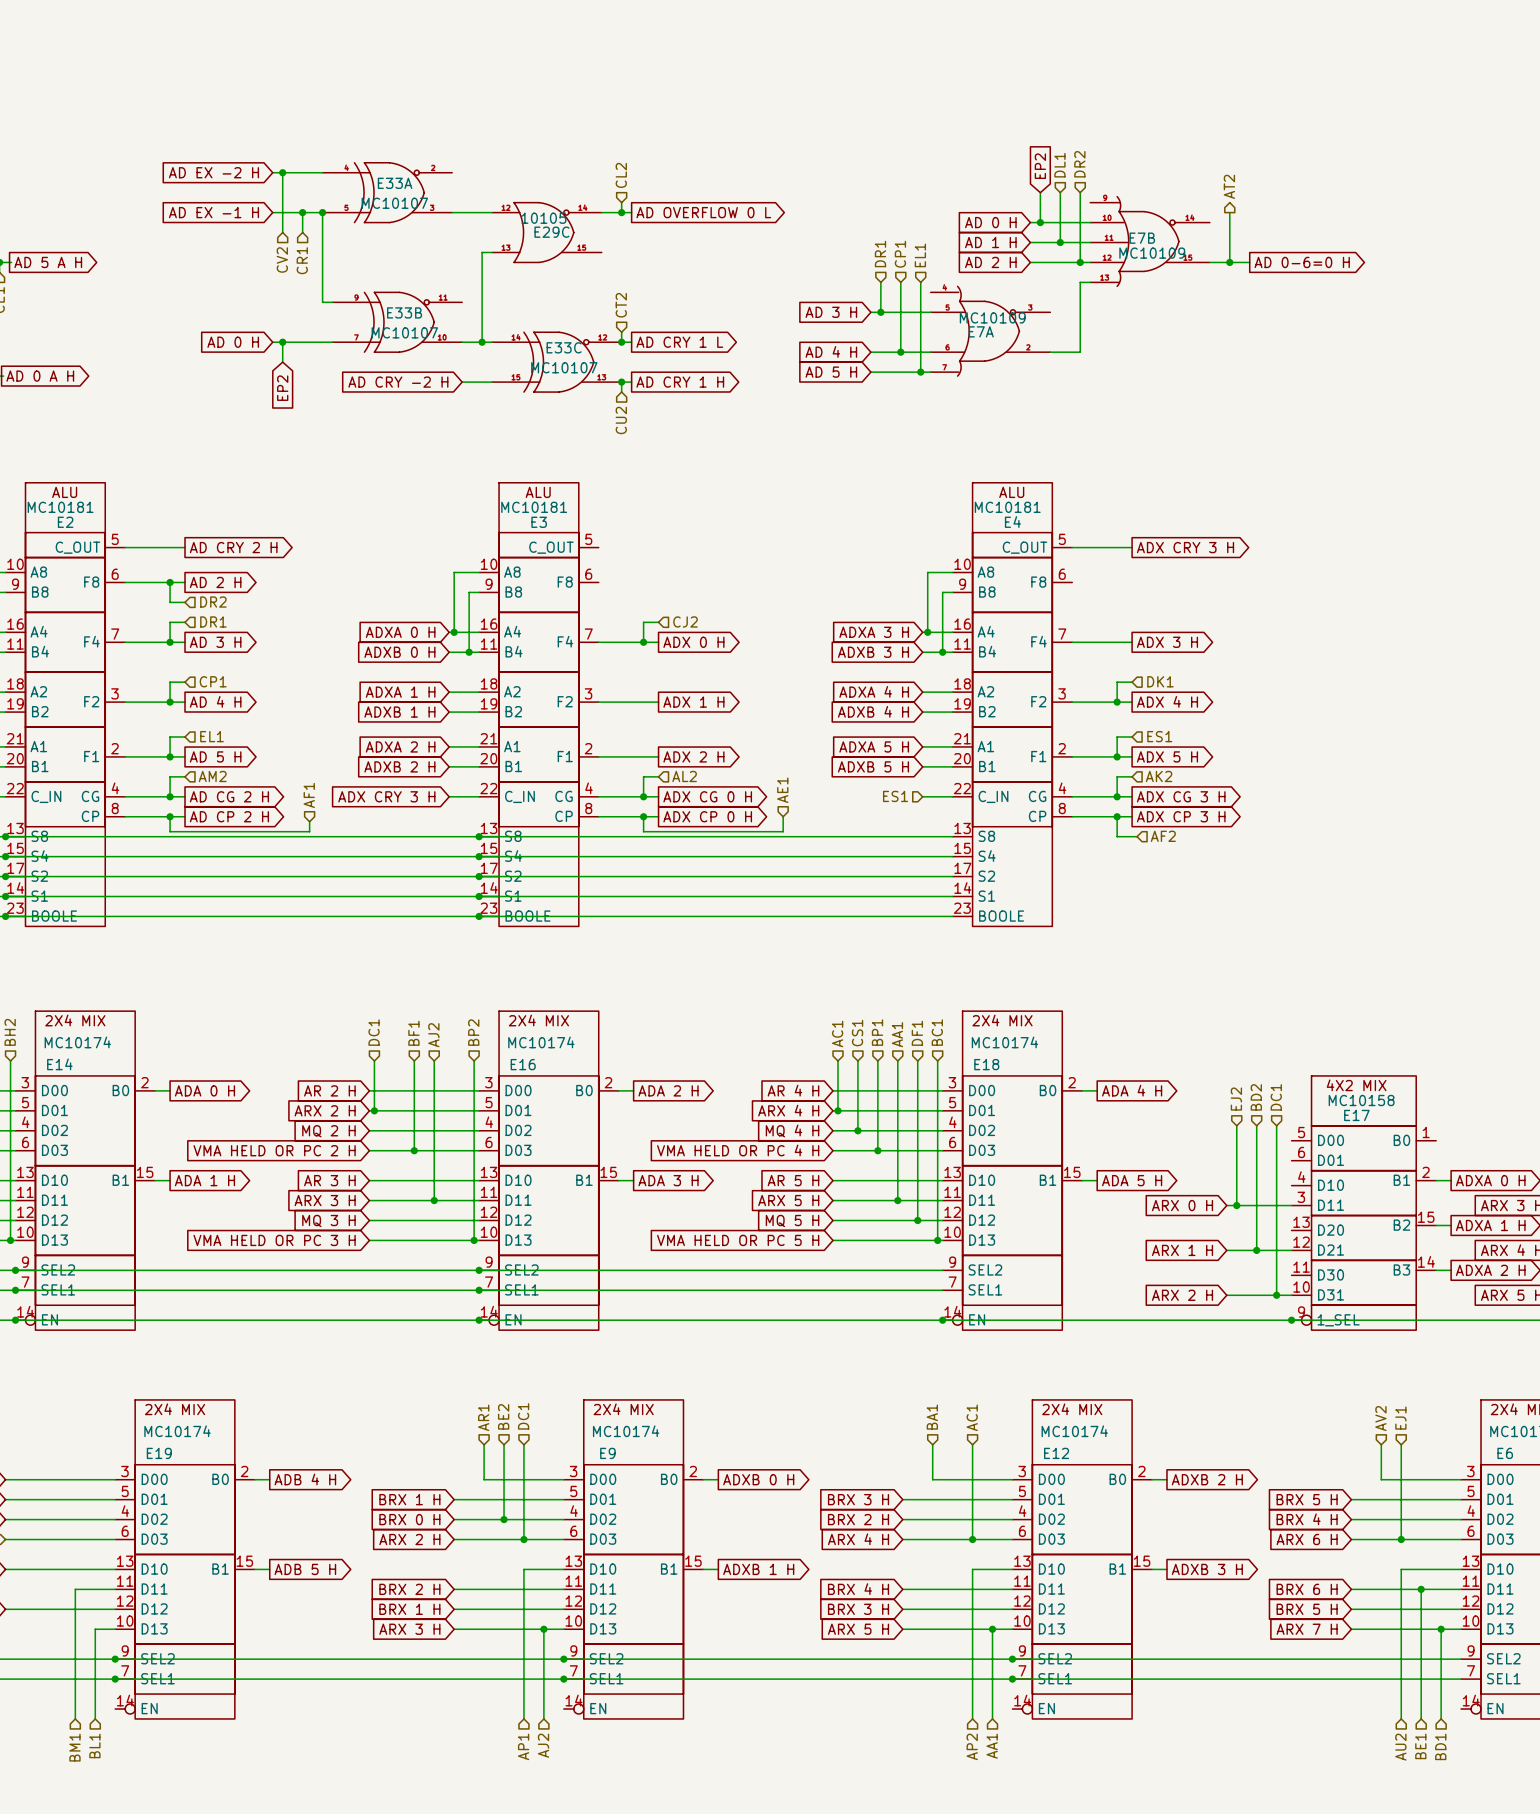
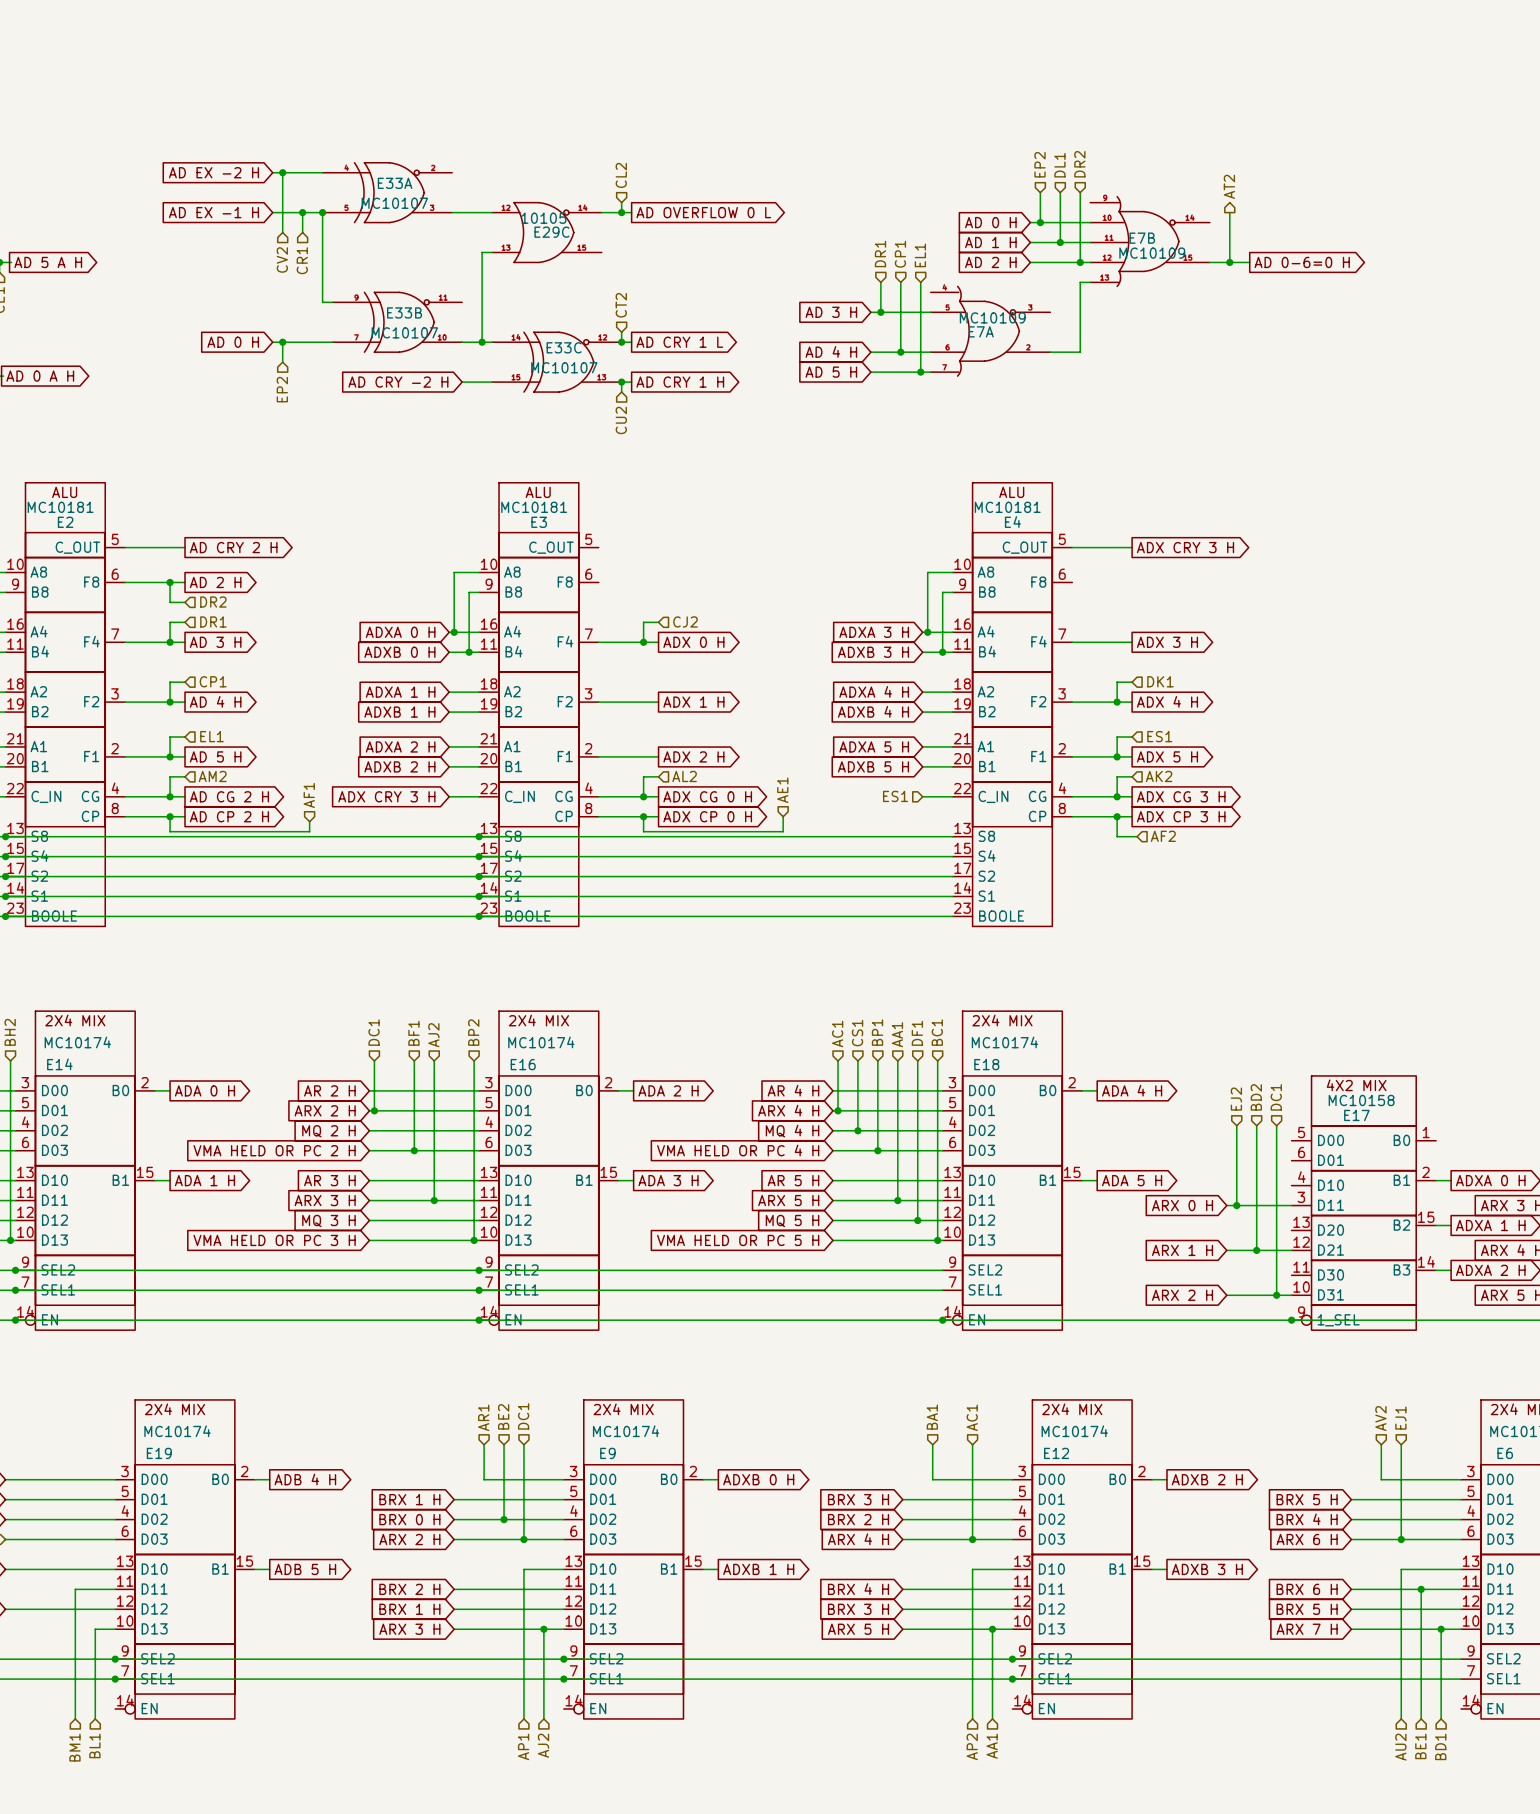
hierarchical label: none -> EP2 (1039, 164)
global label: EP2 (1040, 166) -> none
global label: EP2 (282, 388) -> none
hierarchical label: none -> EP2 (282, 389)

